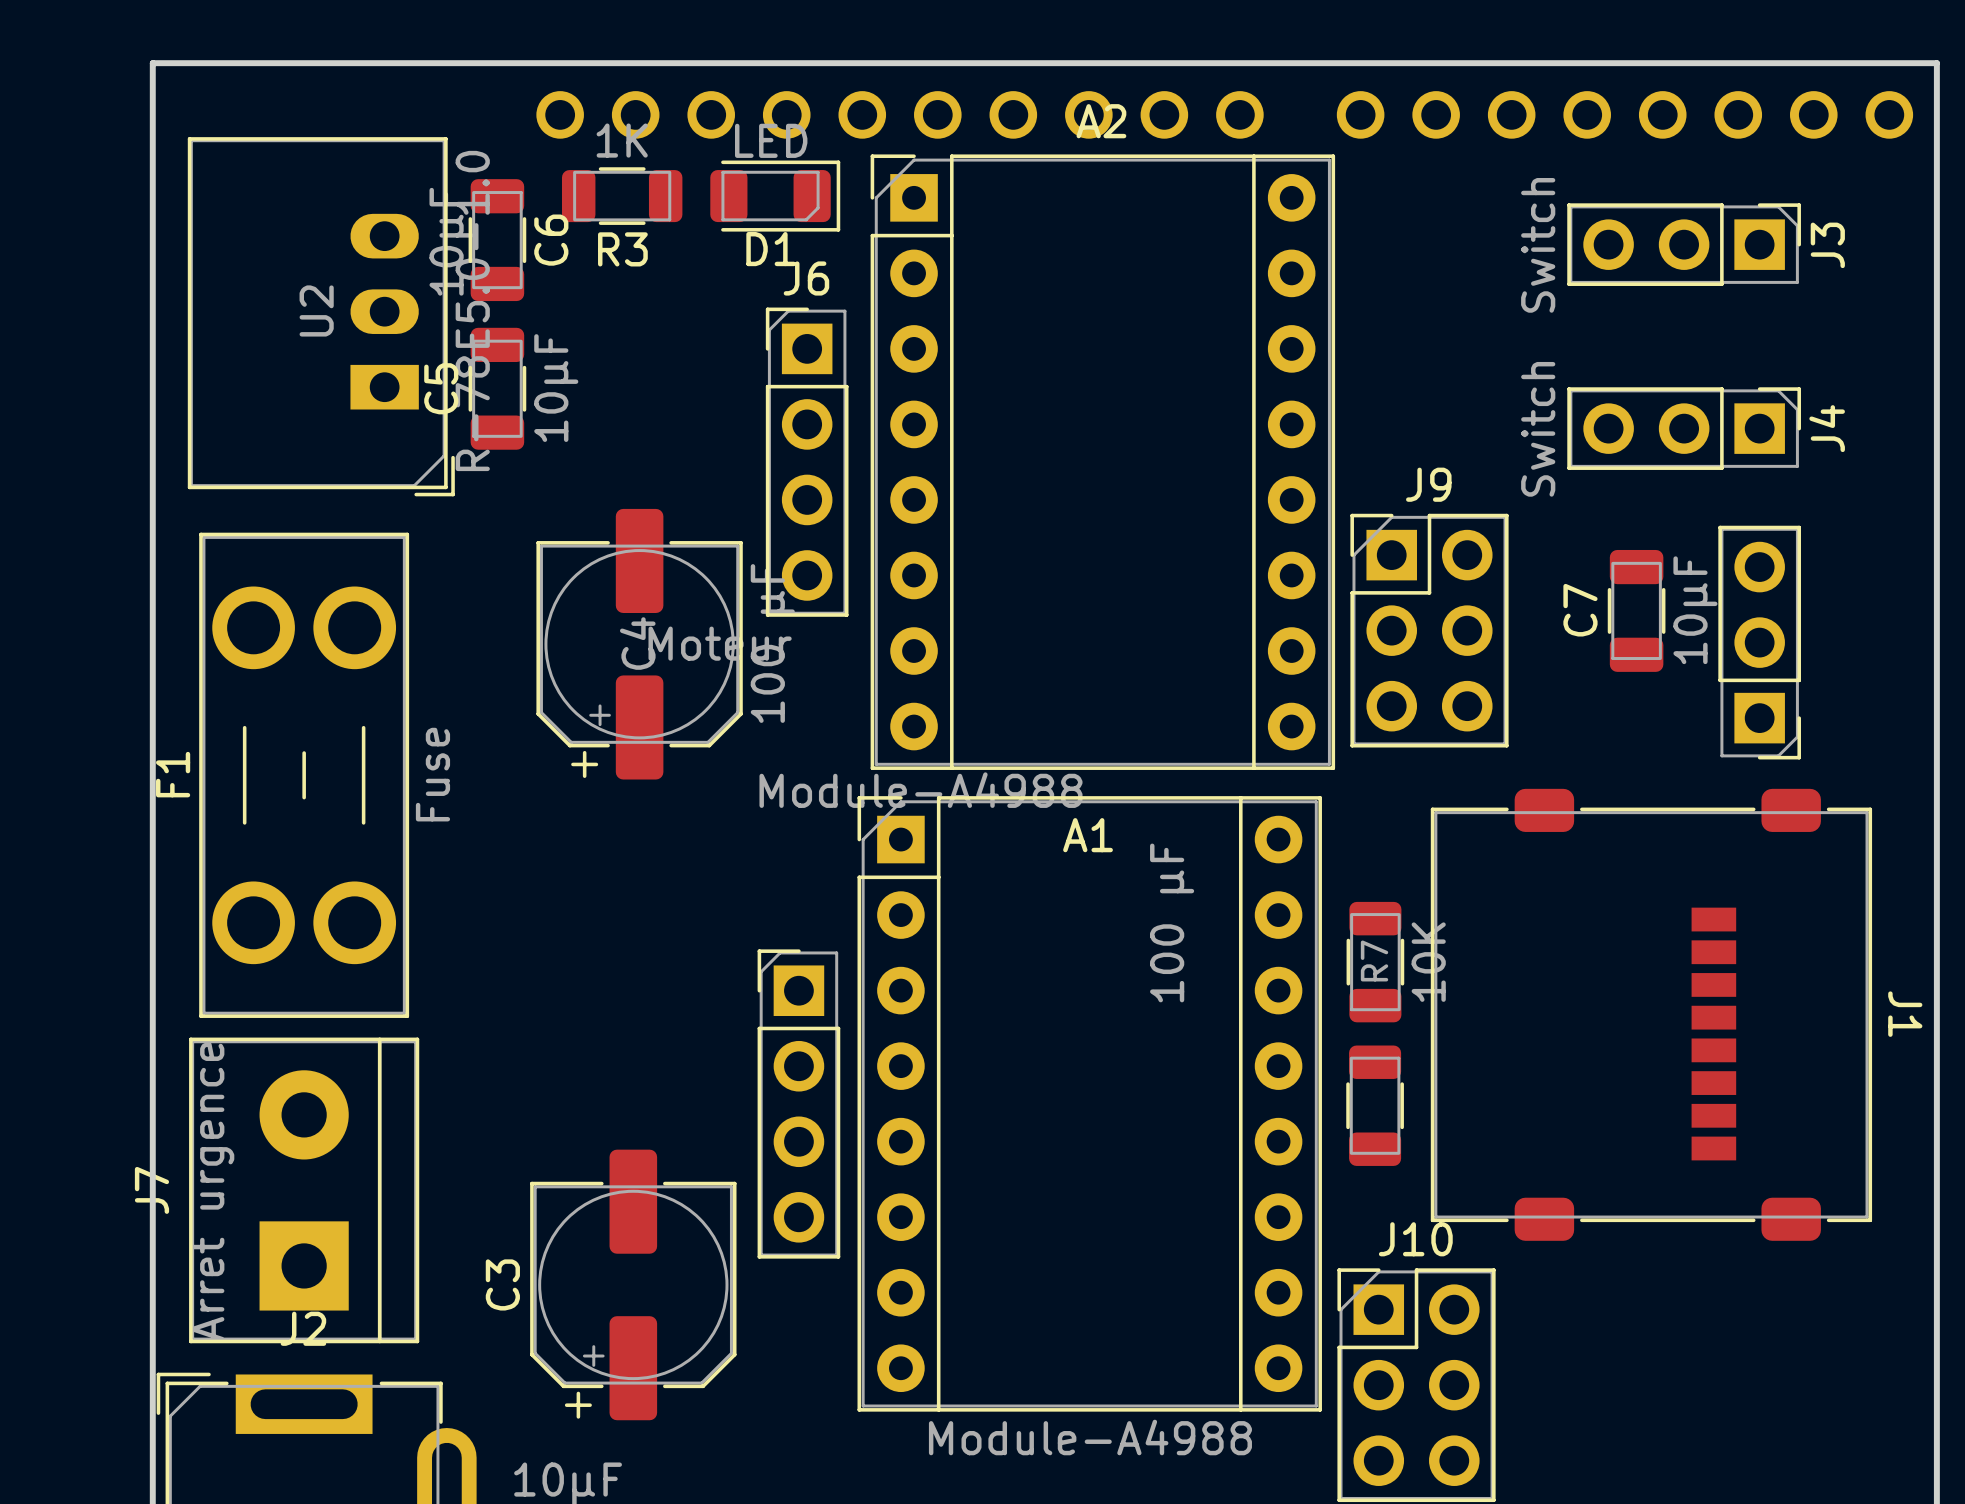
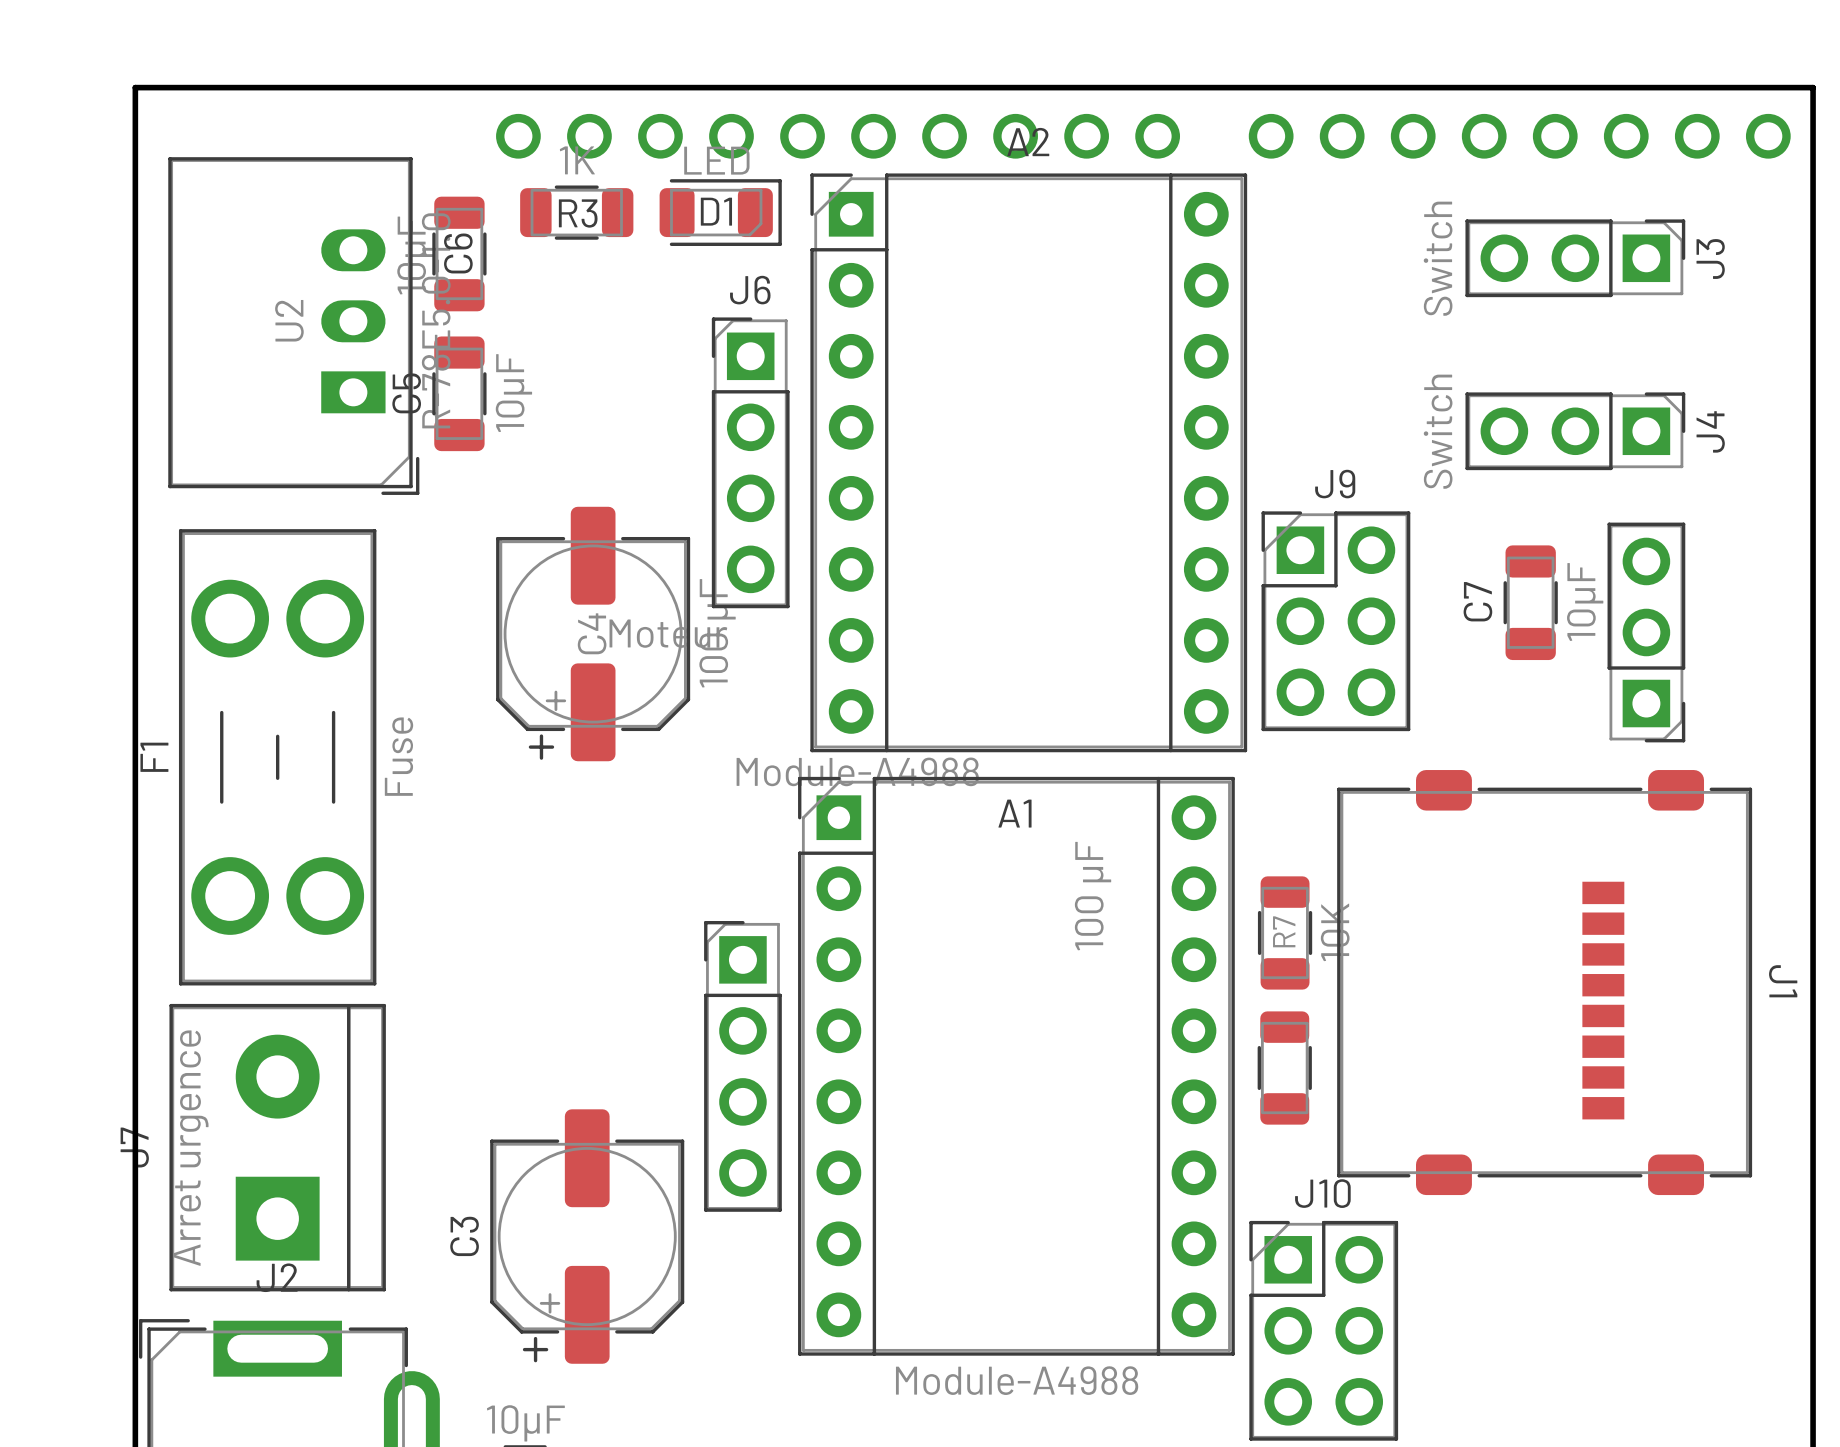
C6 name position: C6 (551, 240) -> C6 (458, 253)
R3 name position: R3 (622, 249) -> R3 (578, 213)
D1 name position: D1 (771, 249) -> D1 (716, 211)

